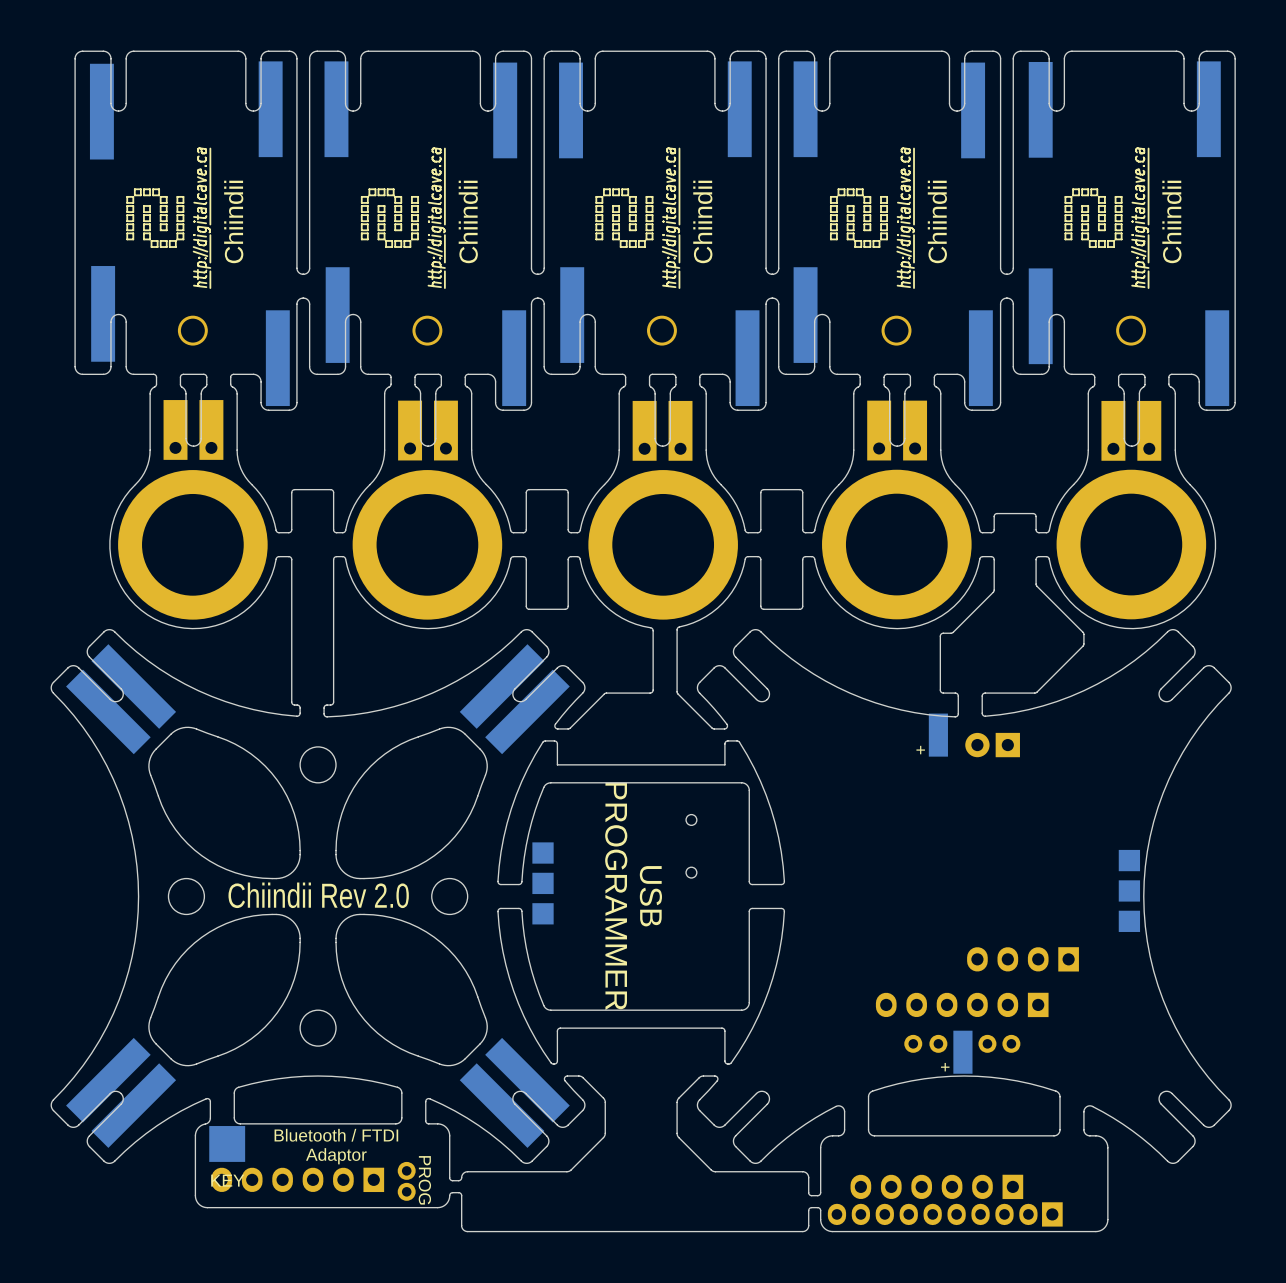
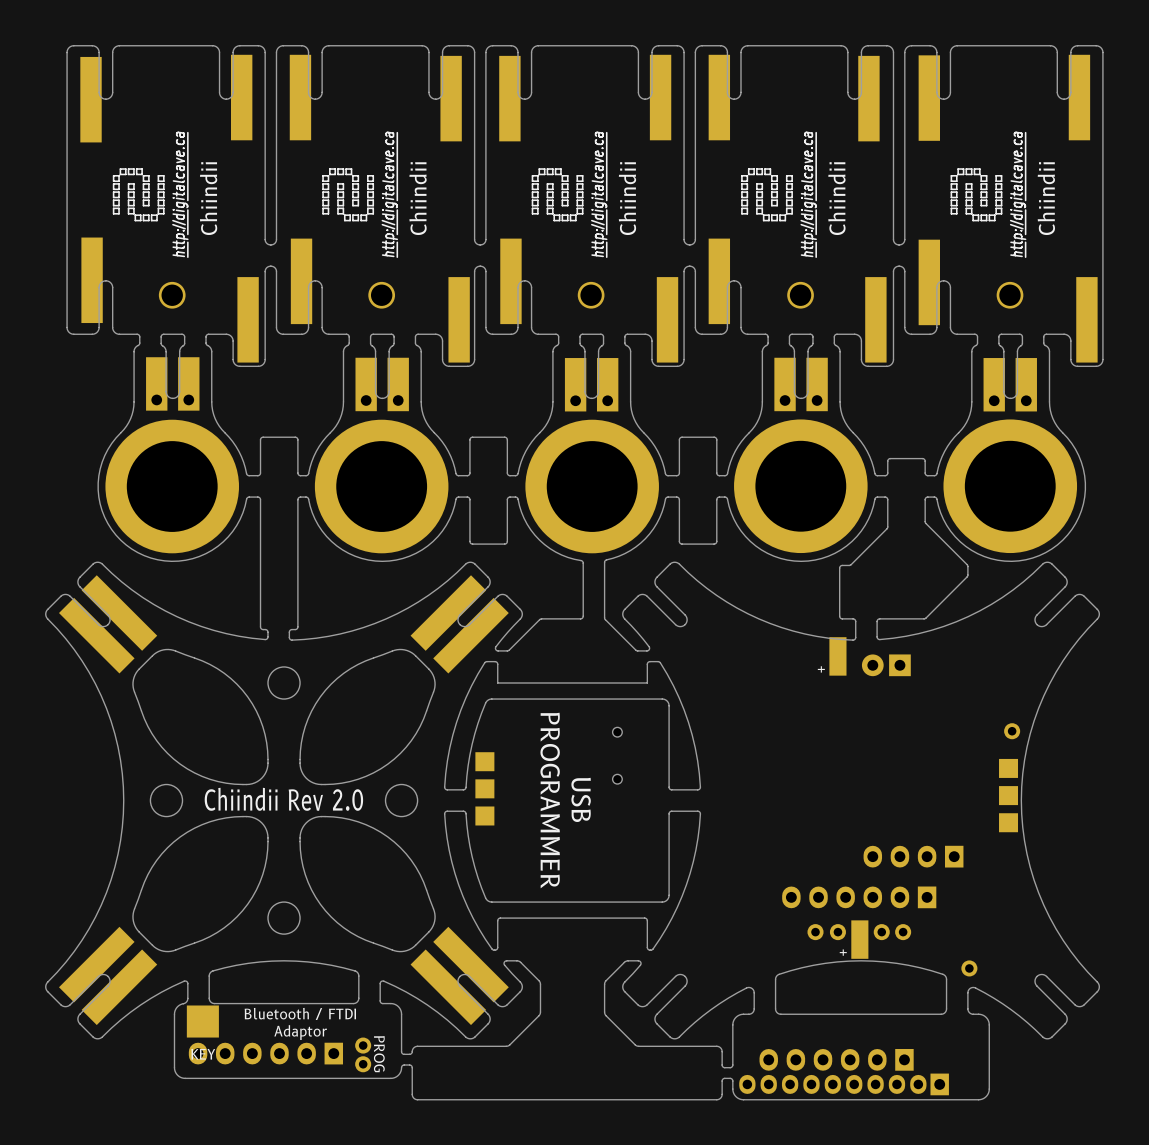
part: none -> (1012, 731)
part: none -> (969, 968)

